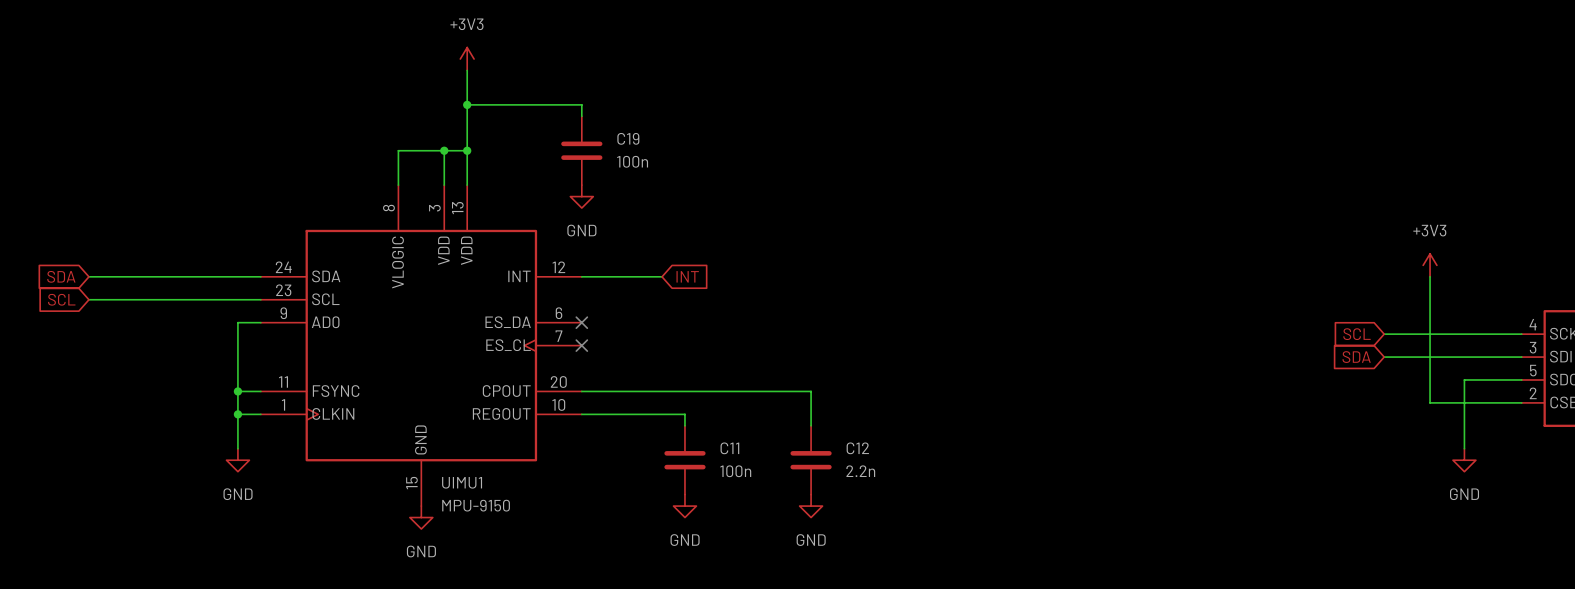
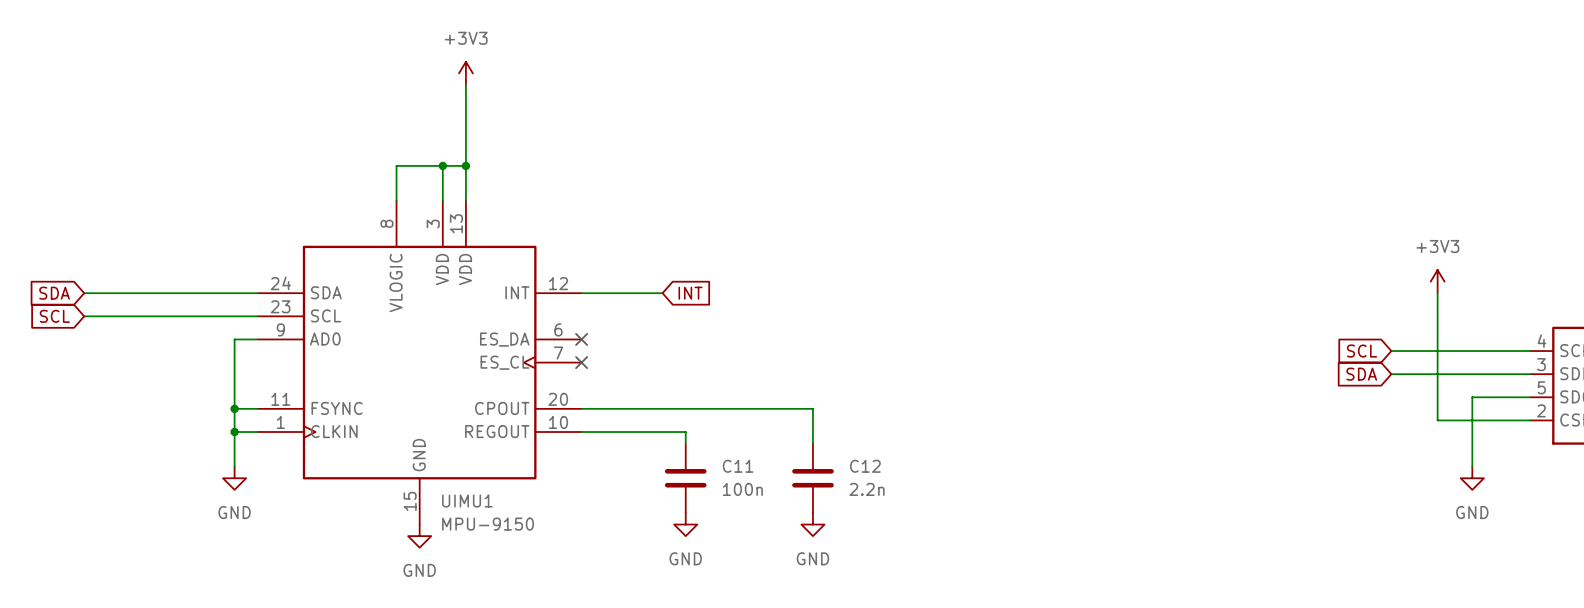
wire: (467, 104) (581, 104) (581, 116) -> none
junction: (467, 104) -> none
C19: 100n (581, 150) -> none
power symbol: GND (581, 196) -> none

